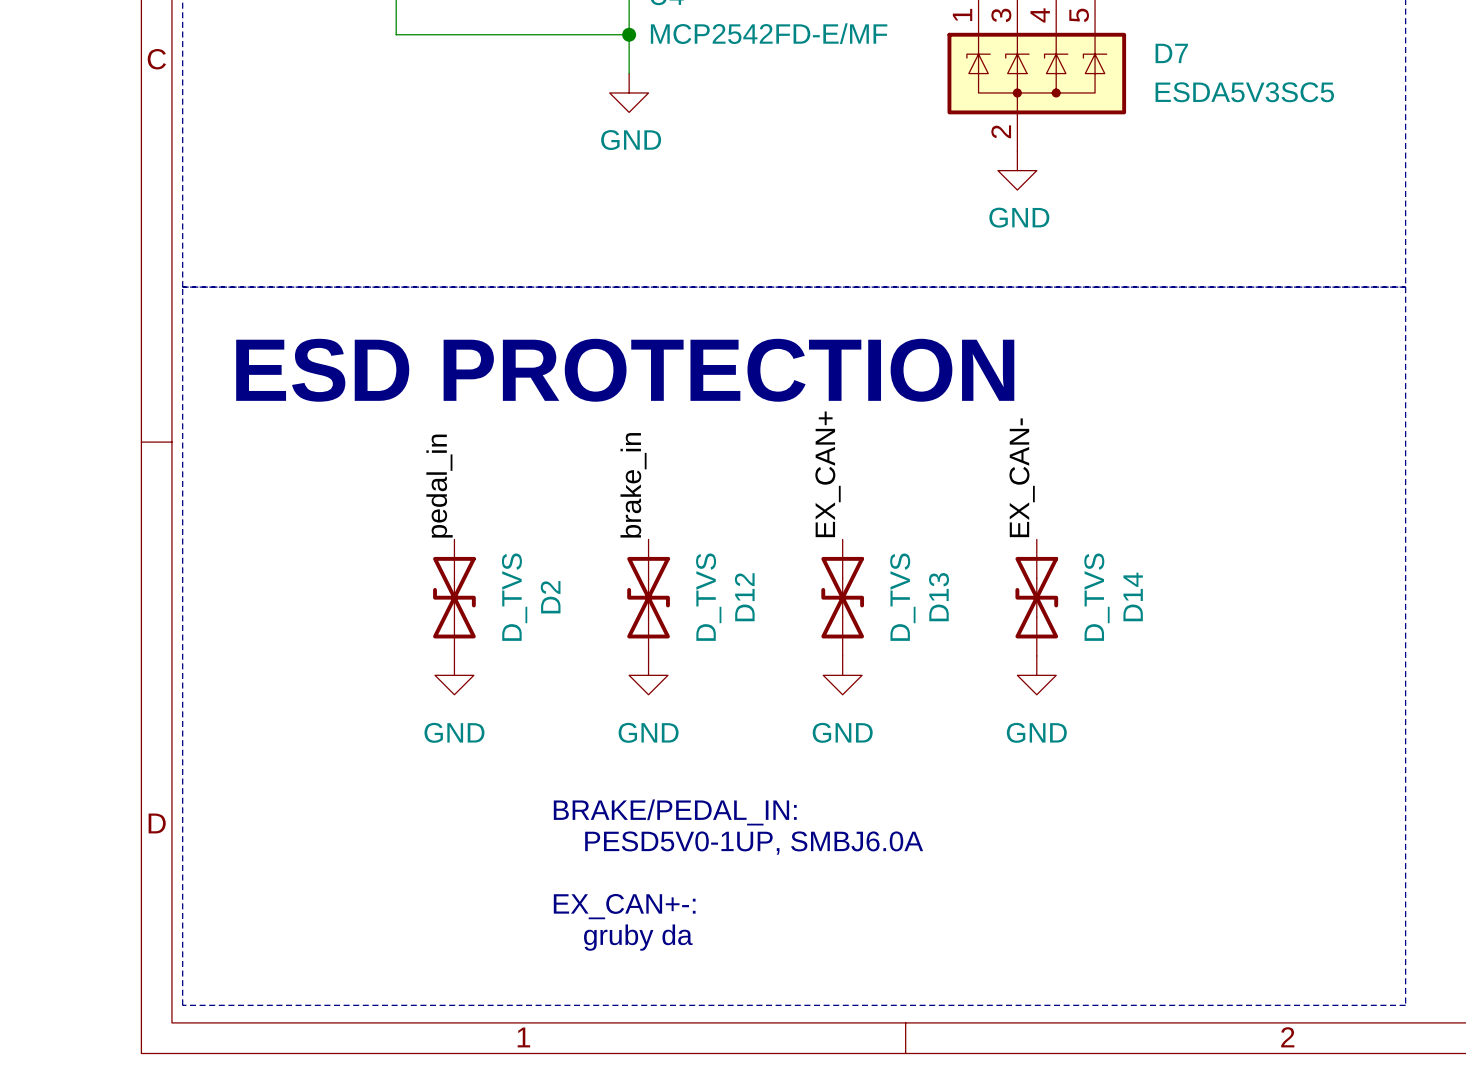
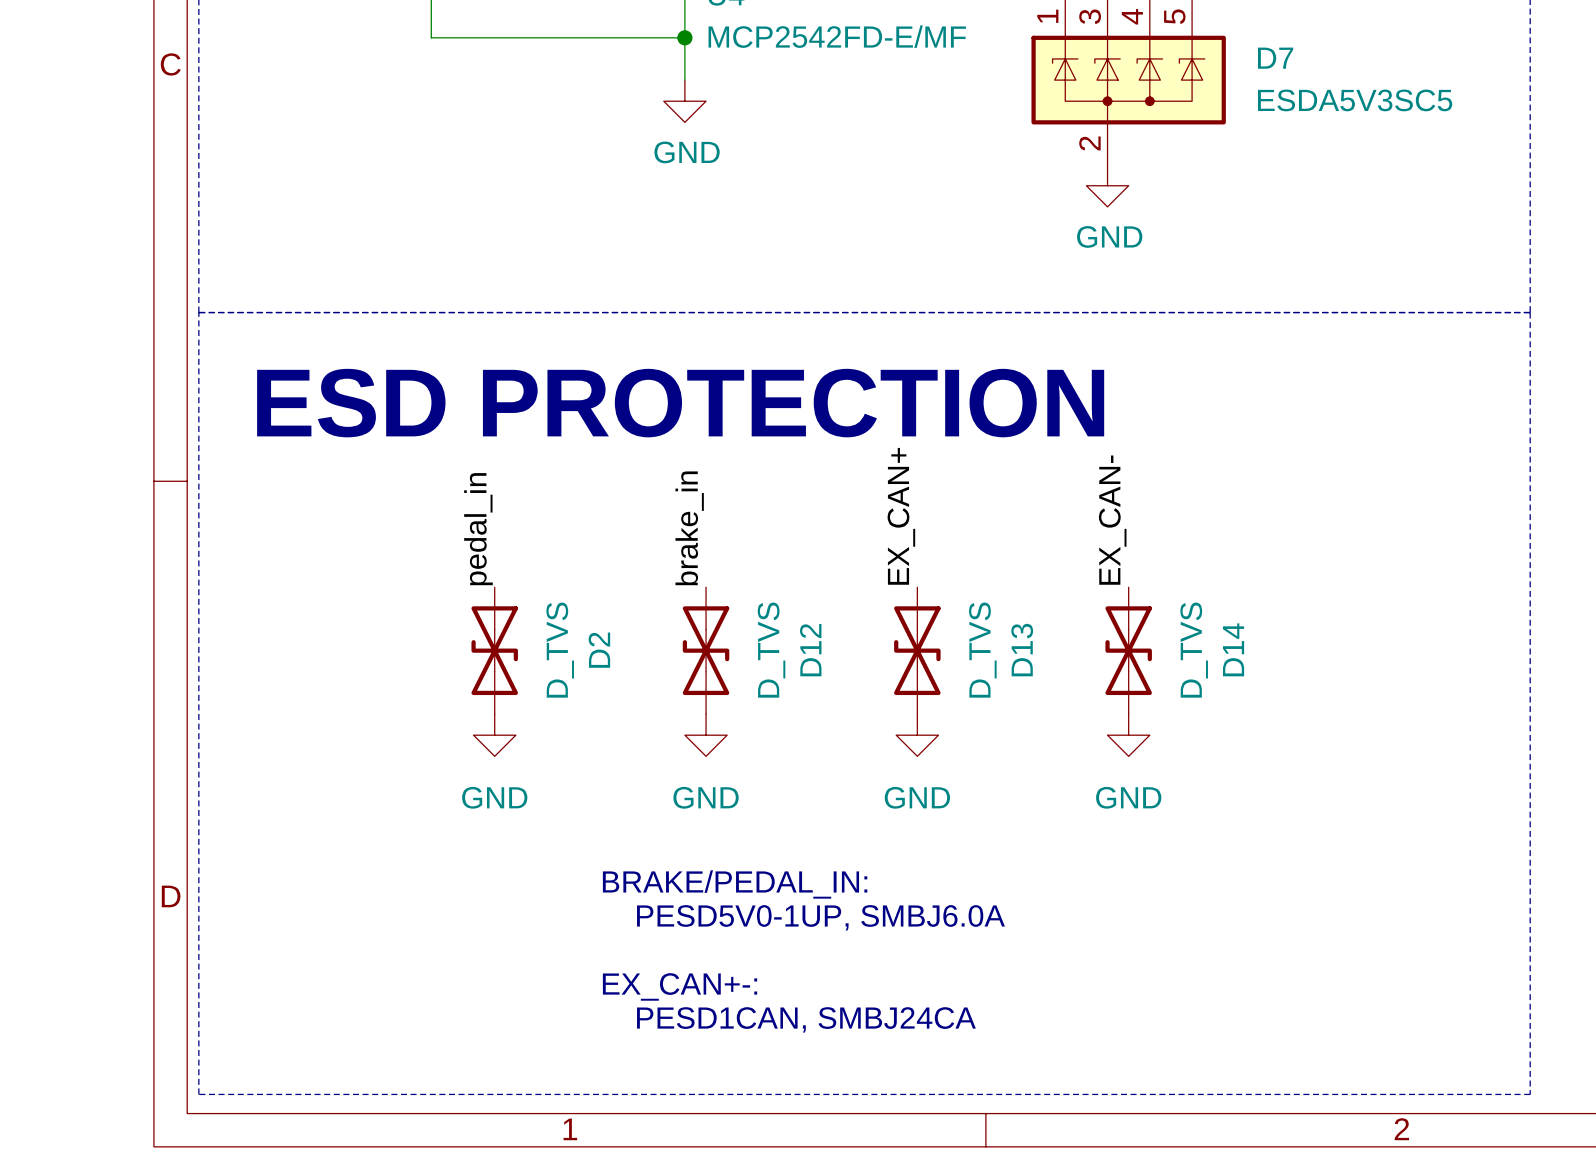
text: gruby da (638, 937) -> PESD1CAN, SMBJ24CA (806, 1019)

